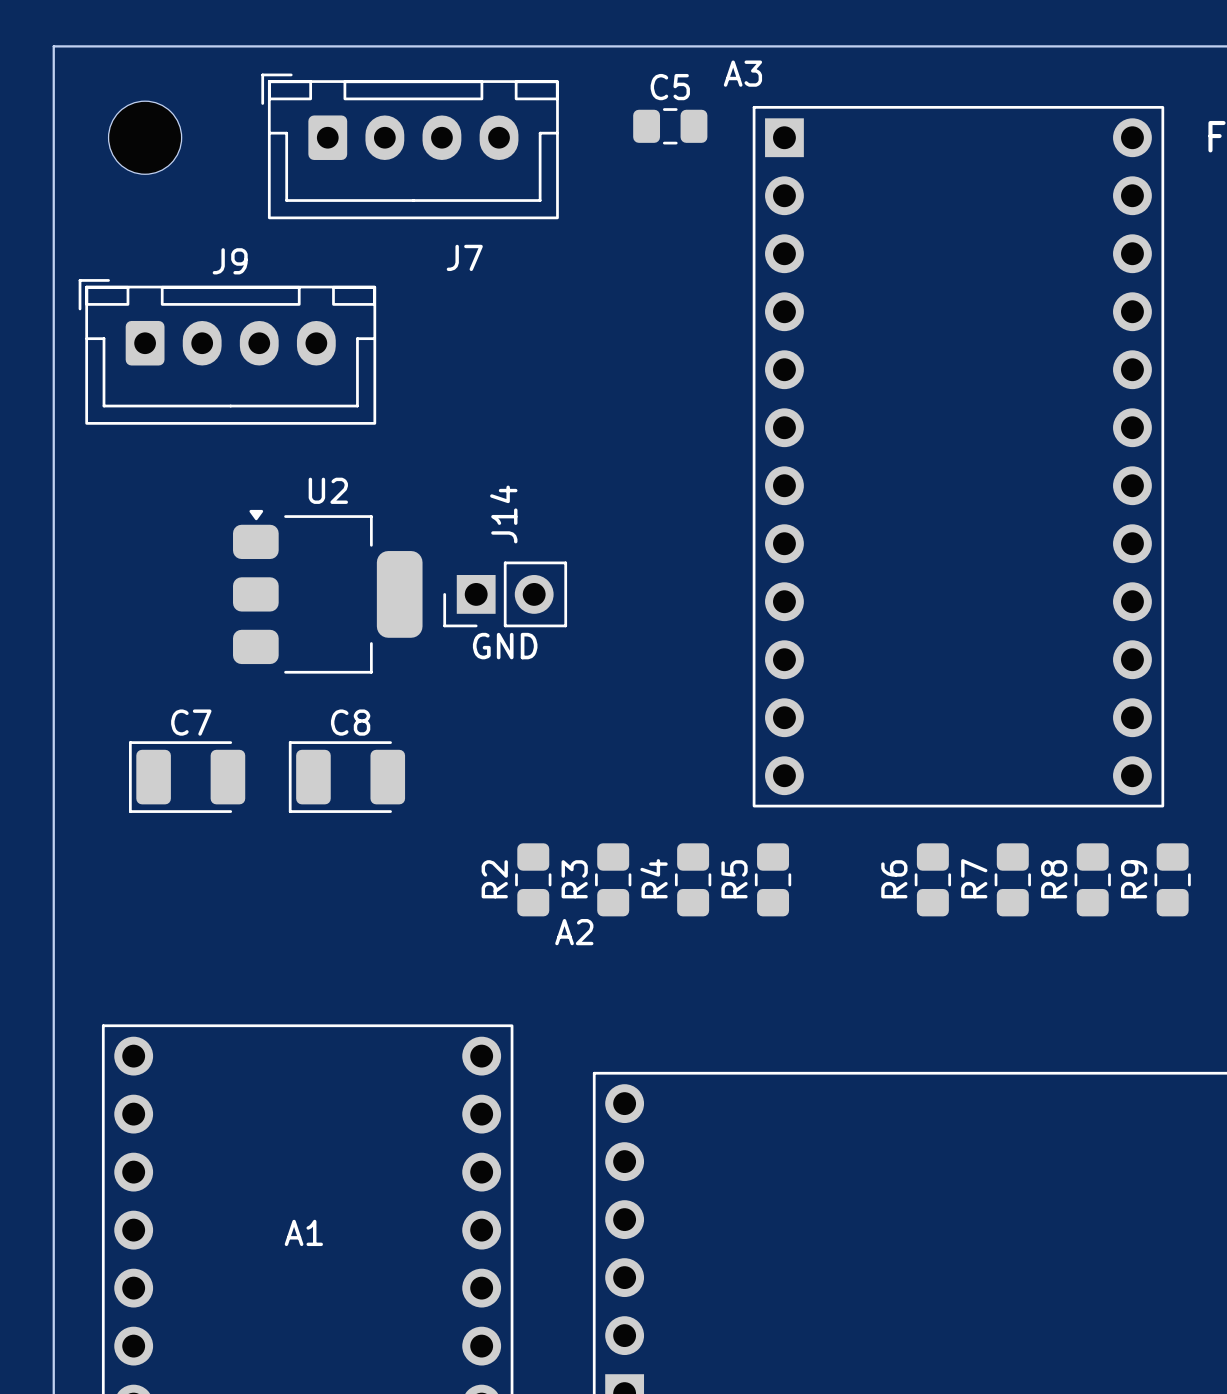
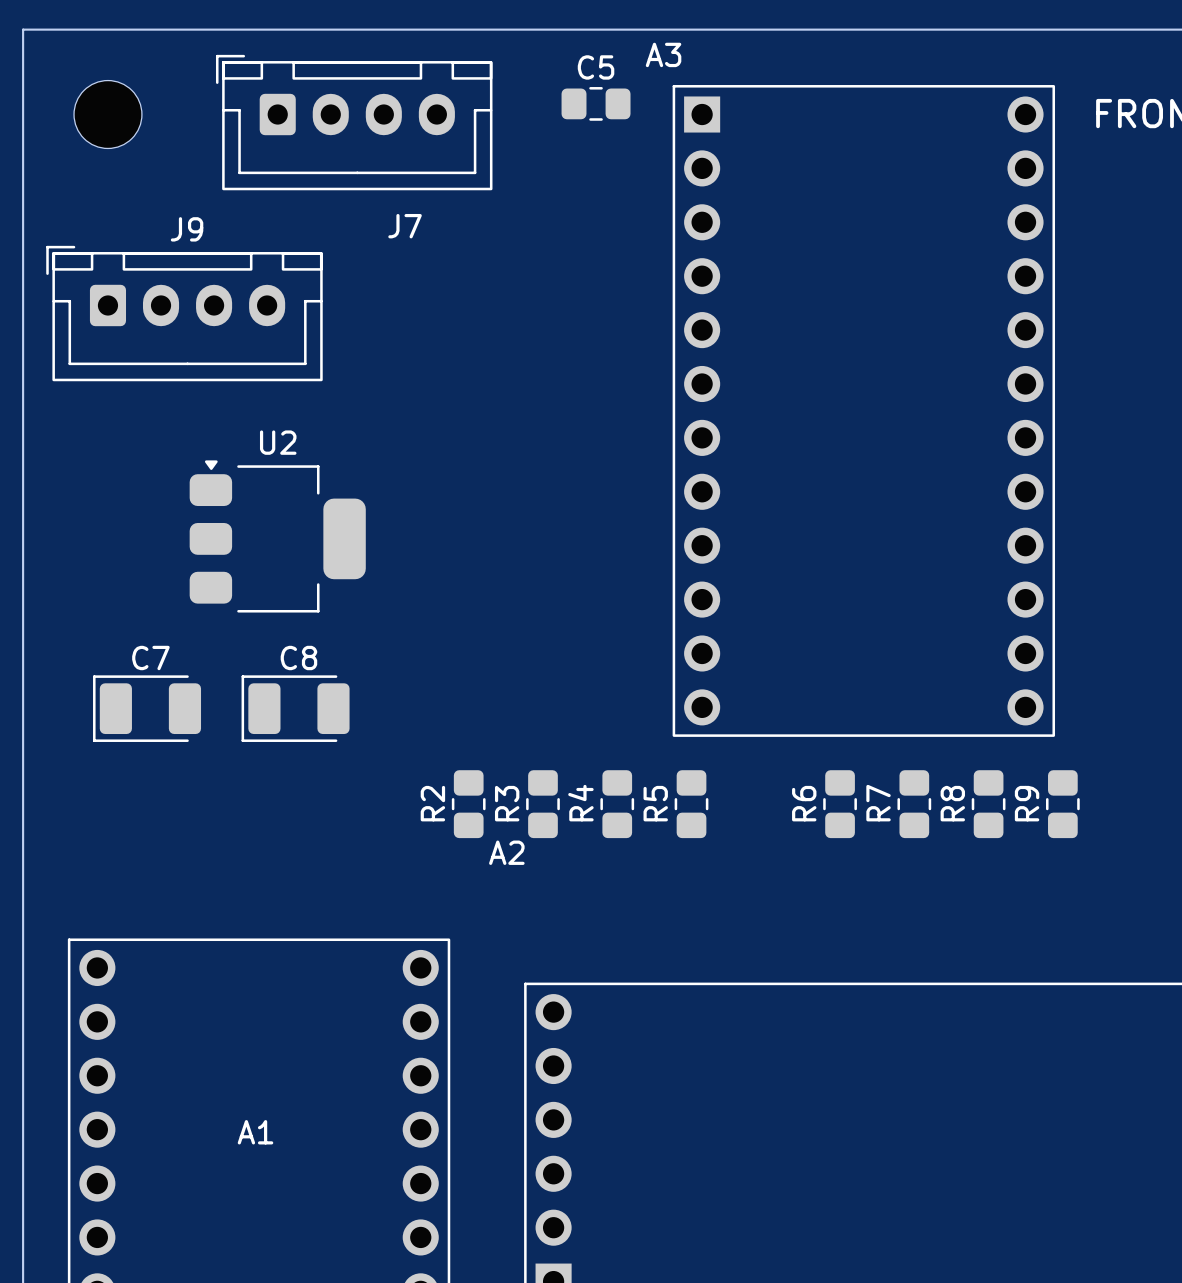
J14: (505, 594) -> none
text: GND (505, 646) -> none

